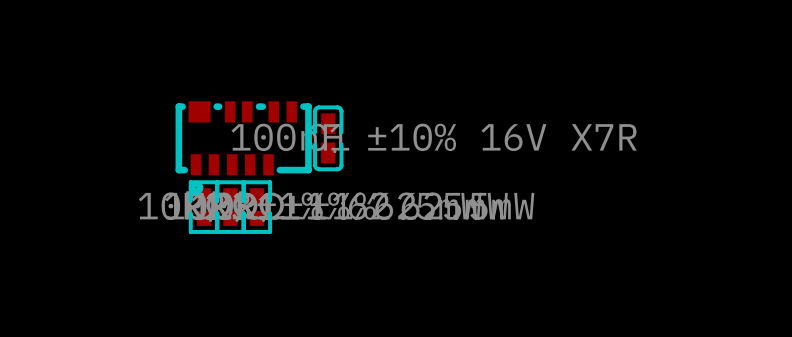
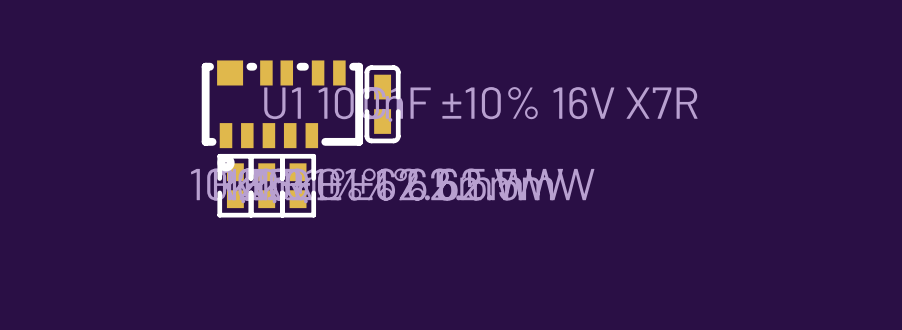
U1 name: none -> U1 (282, 103)

